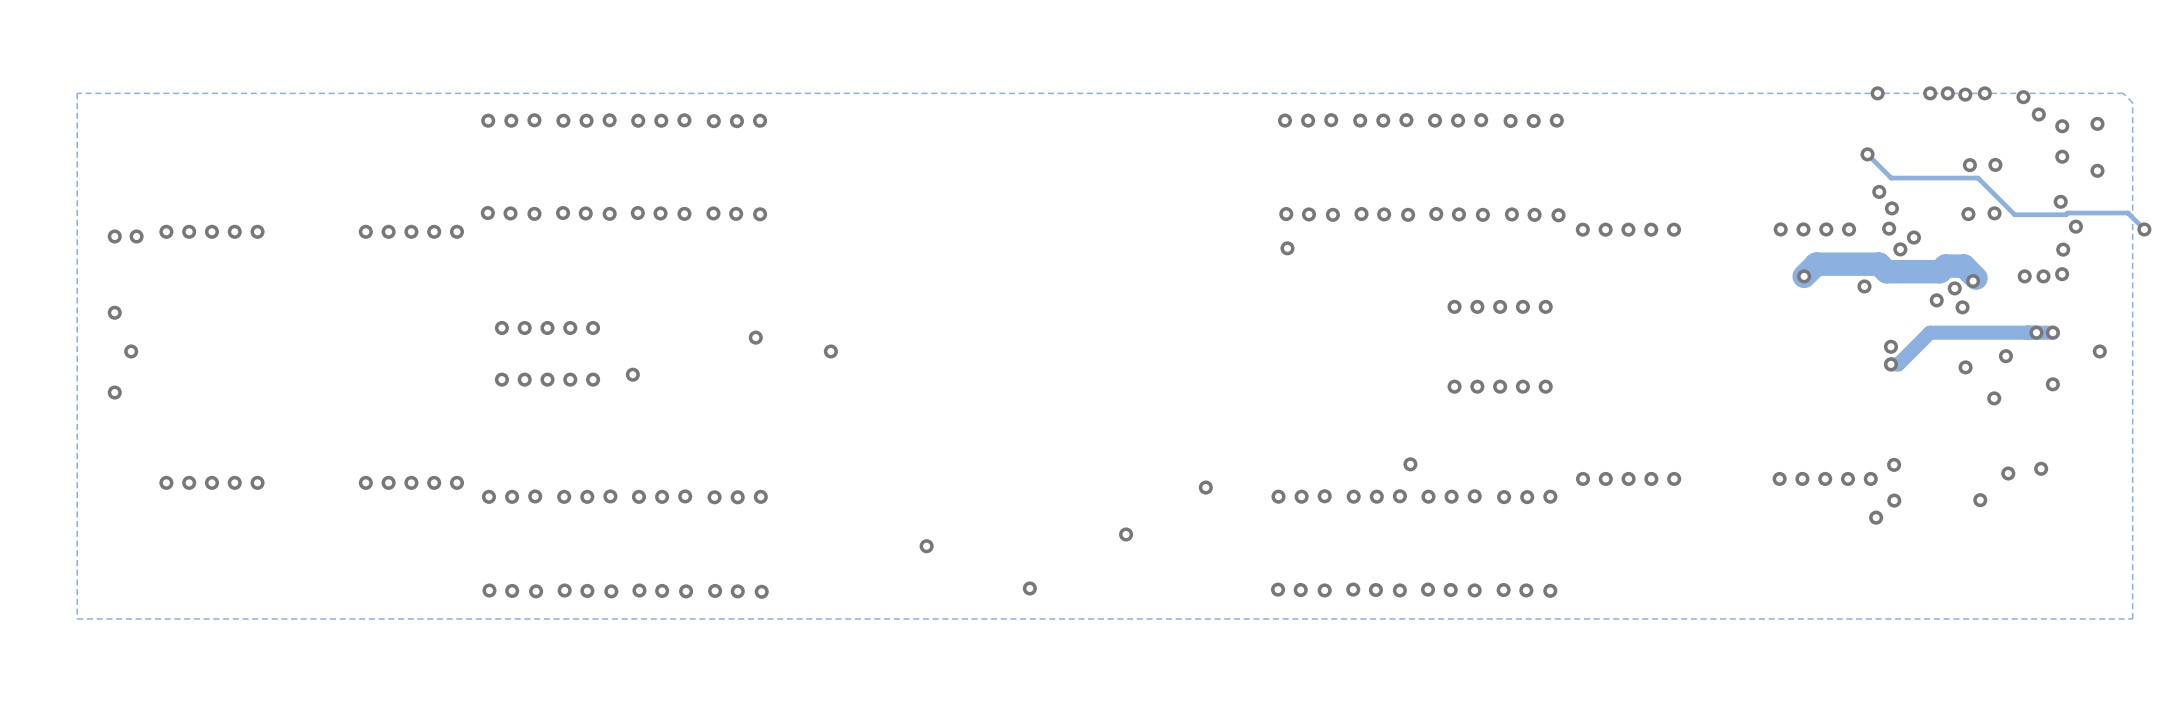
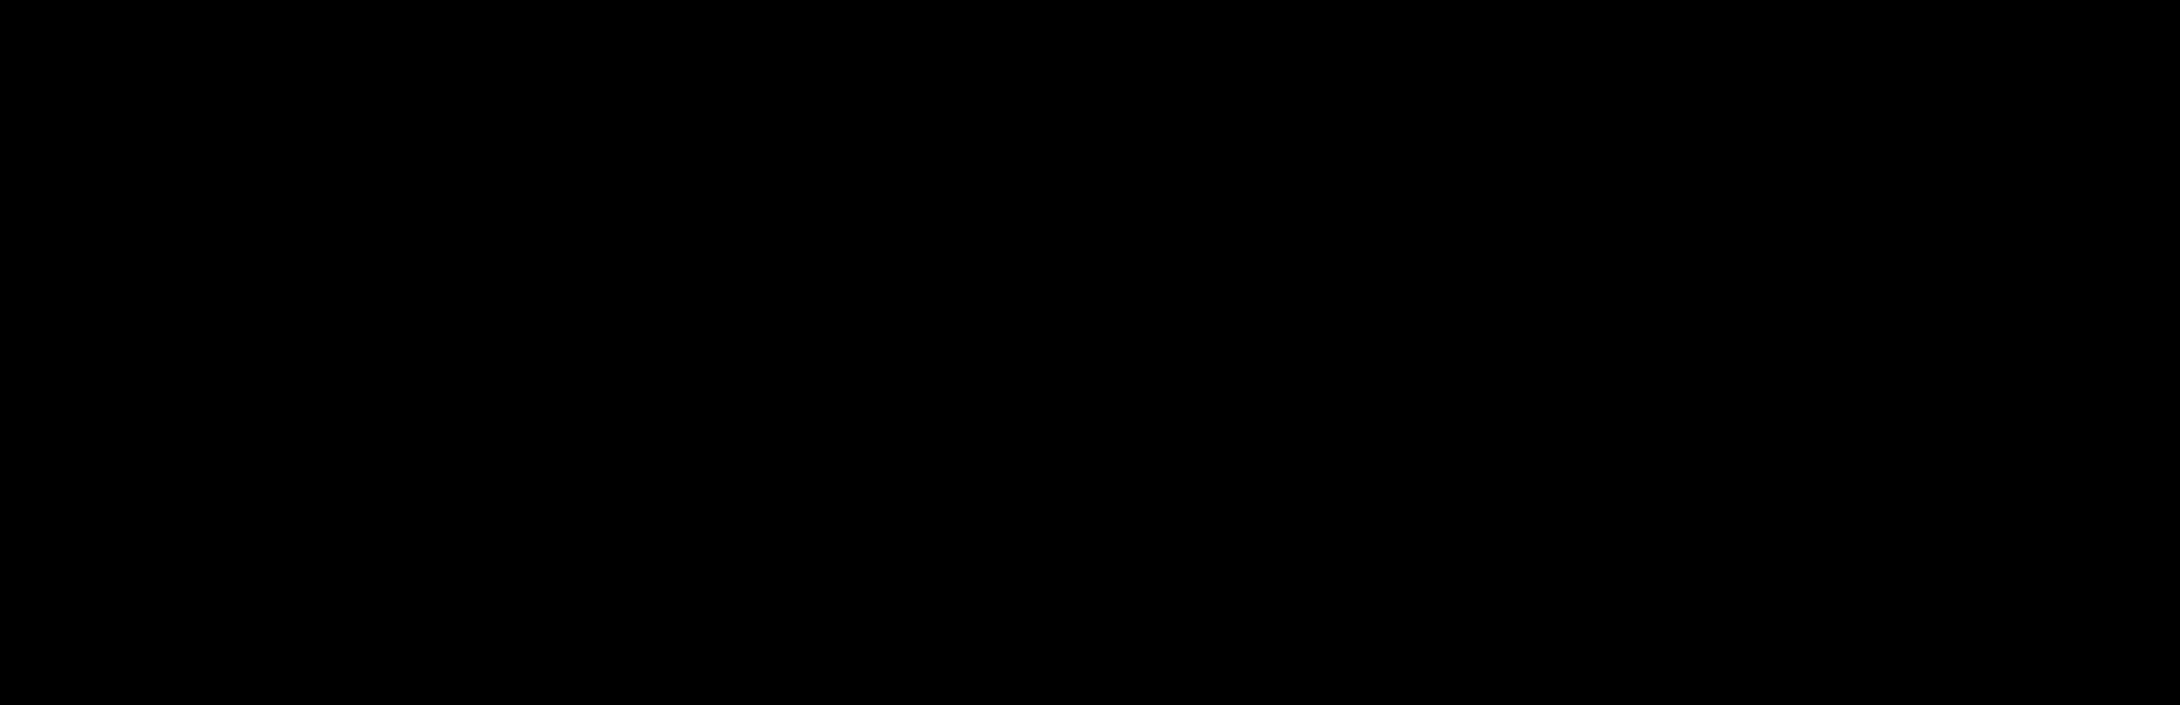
via: (1877, 93) -> none
via: (1930, 93) -> none
via: (1947, 93) -> none
via: (1984, 93) -> none
zone outline: (2123, 93) (77, 93) (77, 618) (2132, 618) (2132, 102) (2123, 93) -> none
via: (1965, 94) -> none
via: (2023, 97) -> none
via: (2038, 114) -> none
via: (488, 120) -> none
via: (511, 120) -> none
via: (534, 120) -> none
via: (563, 120) -> none
via: (586, 120) -> none
via: (609, 120) -> none
via: (638, 120) -> none
via: (661, 120) -> none
via: (684, 120) -> none
via: (760, 120) -> none
via: (1284, 120) -> none
via: (1308, 120) -> none
via: (1331, 120) -> none
via: (1360, 120) -> none
via: (1383, 120) -> none
via: (1406, 120) -> none
via: (1434, 120) -> none
via: (1458, 120) -> none
via: (1481, 120) -> none
via: (1510, 120) -> none
via: (1533, 120) -> none
via: (1556, 120) -> none
via: (713, 121) -> none
via: (736, 121) -> none
via: (2097, 123) -> none
via: (2062, 126) -> none
track: (1867, 154) (1891, 178) (1978, 178) (2014, 214) (2127, 213) (2144, 229) -> none
via: (1867, 154) -> none
via: (2062, 156) -> none
via: (1995, 164) -> none
via: (1969, 165) -> none
via: (2097, 170) -> none
via: (1879, 191) -> none
via: (2060, 201) -> none
via: (1891, 208) -> none
via: (487, 213) -> none
via: (510, 213) -> none
via: (534, 213) -> none
via: (563, 213) -> none
via: (585, 213) -> none
via: (609, 213) -> none
via: (637, 213) -> none
via: (660, 213) -> none
via: (684, 213) -> none
via: (713, 213) -> none
via: (736, 213) -> none
via: (1994, 213) -> none
via: (760, 214) -> none
via: (1286, 214) -> none
via: (1308, 214) -> none
via: (1332, 214) -> none
via: (1361, 214) -> none
via: (1384, 214) -> none
via: (1408, 214) -> none
via: (1436, 214) -> none
via: (1458, 214) -> none
via: (1482, 214) -> none
via: (1511, 214) -> none
via: (1534, 214) -> none
via: (1968, 214) -> none
via: (1558, 215) -> none
via: (2075, 226) -> none
via: (1889, 228) -> none
via: (1582, 229) -> none
via: (1605, 229) -> none
via: (1628, 229) -> none
via: (1651, 229) -> none
via: (1673, 229) -> none
via: (1780, 229) -> none
via: (1803, 229) -> none
via: (1826, 229) -> none
via: (1849, 229) -> none
via: (2144, 229) -> none
via: (166, 231) -> none
via: (189, 231) -> none
via: (211, 231) -> none
via: (234, 231) -> none
via: (257, 231) -> none
via: (365, 231) -> none
via: (388, 231) -> none
via: (411, 231) -> none
via: (434, 231) -> none
via: (456, 231) -> none
via: (114, 236) -> none
via: (136, 236) -> none
via: (1913, 237) -> none
via: (1287, 248) -> none
via: (1900, 249) -> none
via: (2063, 249) -> none
via: (2062, 274) -> none
track: (1804, 276) (1816, 264) (1879, 264) (1886, 271) (1939, 271) (1945, 266) (1964, 266) (1976, 278) -> none
via: (1804, 276) -> none
via: (2024, 276) -> none
via: (2043, 276) -> none
via: (1973, 281) -> none
via: (1864, 286) -> none
via: (1954, 288) -> none
via: (1936, 300) -> none
via: (1454, 306) -> none
via: (1477, 306) -> none
via: (1500, 306) -> none
via: (1522, 306) -> none
via: (1545, 306) -> none
via: (1962, 307) -> none
via: (114, 312) -> none
via: (501, 328) -> none
via: (524, 328) -> none
via: (547, 328) -> none
via: (570, 328) -> none
via: (593, 328) -> none
via: (2036, 332) -> none
track: (2052, 332) (1929, 332) (1898, 364) (1890, 364) -> none
via: (2052, 332) -> none
via: (755, 337) -> none
via: (1890, 346) -> none
via: (131, 351) -> none
via: (830, 351) -> none
via: (2099, 351) -> none
via: (2005, 356) -> none
via: (1890, 364) -> none
via: (1965, 367) -> none
via: (632, 374) -> none
via: (501, 379) -> none
via: (524, 379) -> none
via: (547, 379) -> none
via: (570, 379) -> none
via: (593, 379) -> none
via: (2052, 384) -> none
via: (1454, 386) -> none
via: (1477, 386) -> none
via: (1500, 386) -> none
via: (1522, 386) -> none
via: (1545, 386) -> none
via: (114, 392) -> none
via: (1994, 398) -> none
via: (1410, 464) -> none
via: (1894, 464) -> none
via: (2041, 468) -> none
via: (2008, 473) -> none
via: (1583, 478) -> none
via: (1605, 478) -> none
via: (1628, 478) -> none
via: (1651, 478) -> none
via: (1674, 478) -> none
via: (1779, 478) -> none
via: (1802, 478) -> none
via: (1825, 478) -> none
via: (1847, 478) -> none
via: (1870, 478) -> none
via: (166, 482) -> none
via: (189, 482) -> none
via: (211, 482) -> none
via: (234, 482) -> none
via: (257, 482) -> none
via: (365, 482) -> none
via: (388, 482) -> none
via: (411, 482) -> none
via: (434, 482) -> none
via: (456, 482) -> none
via: (1205, 487) -> none
via: (488, 496) -> none
via: (512, 496) -> none
via: (535, 496) -> none
via: (564, 496) -> none
via: (587, 496) -> none
via: (610, 496) -> none
via: (638, 496) -> none
via: (662, 496) -> none
via: (685, 496) -> none
via: (760, 496) -> none
via: (1278, 496) -> none
via: (1301, 496) -> none
via: (1324, 496) -> none
via: (1353, 496) -> none
via: (1376, 496) -> none
via: (1399, 496) -> none
via: (1428, 496) -> none
via: (1451, 496) -> none
via: (1474, 496) -> none
via: (1550, 496) -> none
via: (714, 497) -> none
via: (737, 497) -> none
via: (1504, 497) -> none
via: (1527, 497) -> none
via: (1894, 500) -> none
via: (1980, 500) -> none
via: (1876, 517) -> none
via: (1126, 534) -> none
via: (926, 546) -> none
via: (1029, 588) -> none
via: (1278, 589) -> none
via: (1353, 589) -> none
via: (1428, 589) -> none
via: (489, 590) -> none
via: (512, 590) -> none
via: (564, 590) -> none
via: (587, 590) -> none
via: (639, 590) -> none
via: (662, 590) -> none
via: (715, 590) -> none
via: (1300, 590) -> none
via: (1324, 590) -> none
via: (1375, 590) -> none
via: (1399, 590) -> none
via: (1450, 590) -> none
via: (1474, 590) -> none
via: (1503, 590) -> none
via: (1526, 590) -> none
via: (1550, 590) -> none
via: (536, 591) -> none
via: (611, 591) -> none
via: (686, 591) -> none
via: (737, 591) -> none
via: (761, 591) -> none

